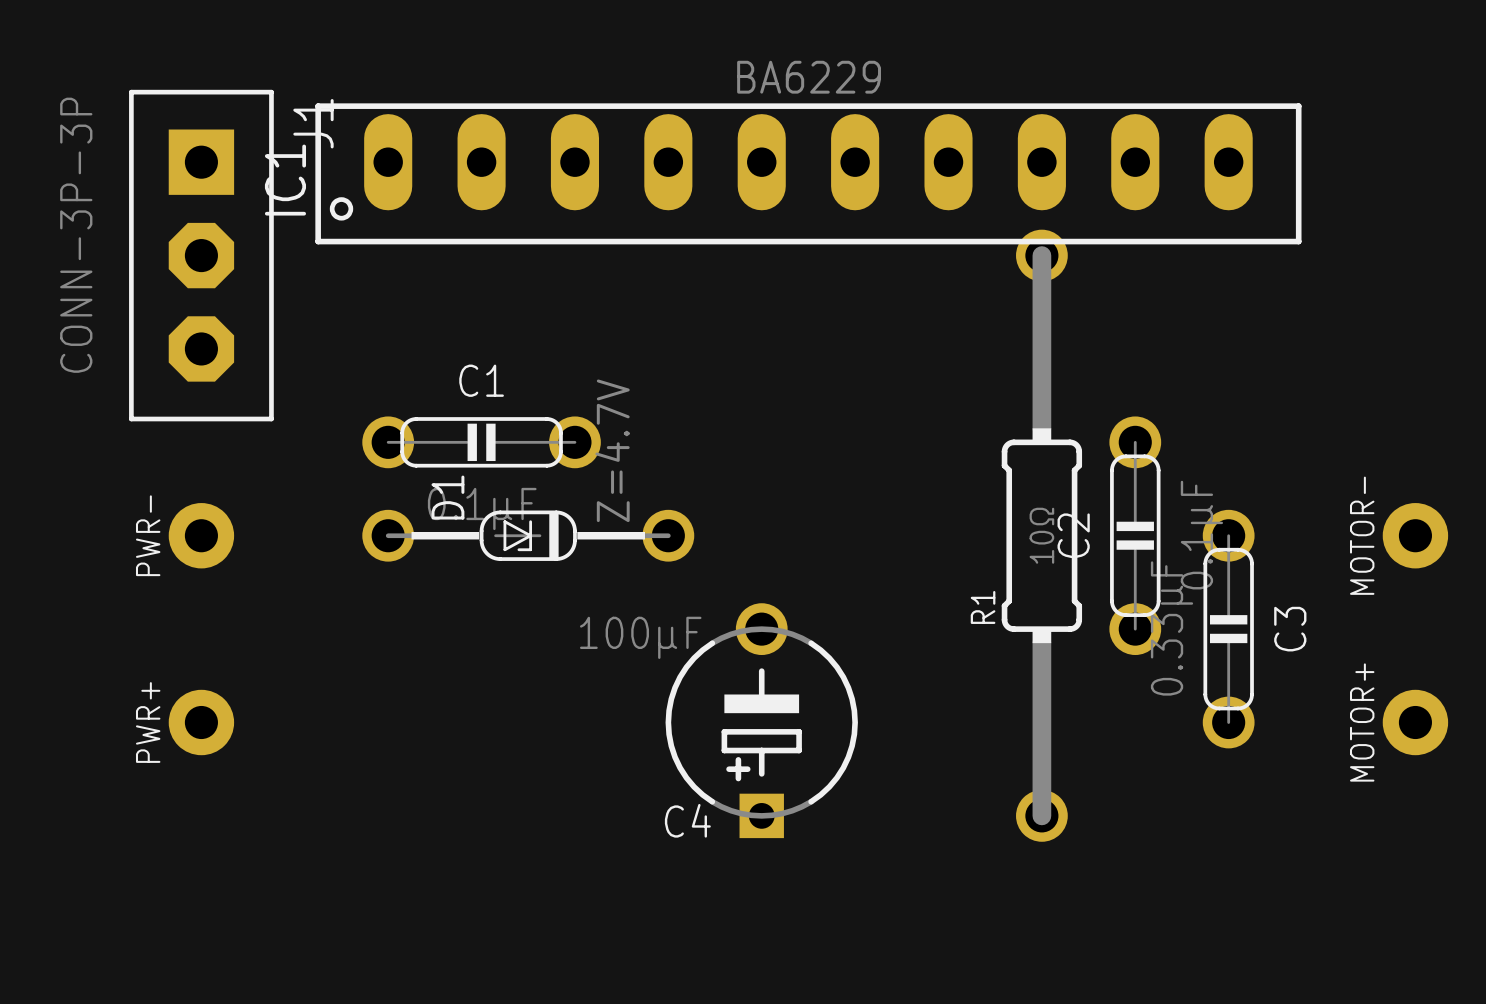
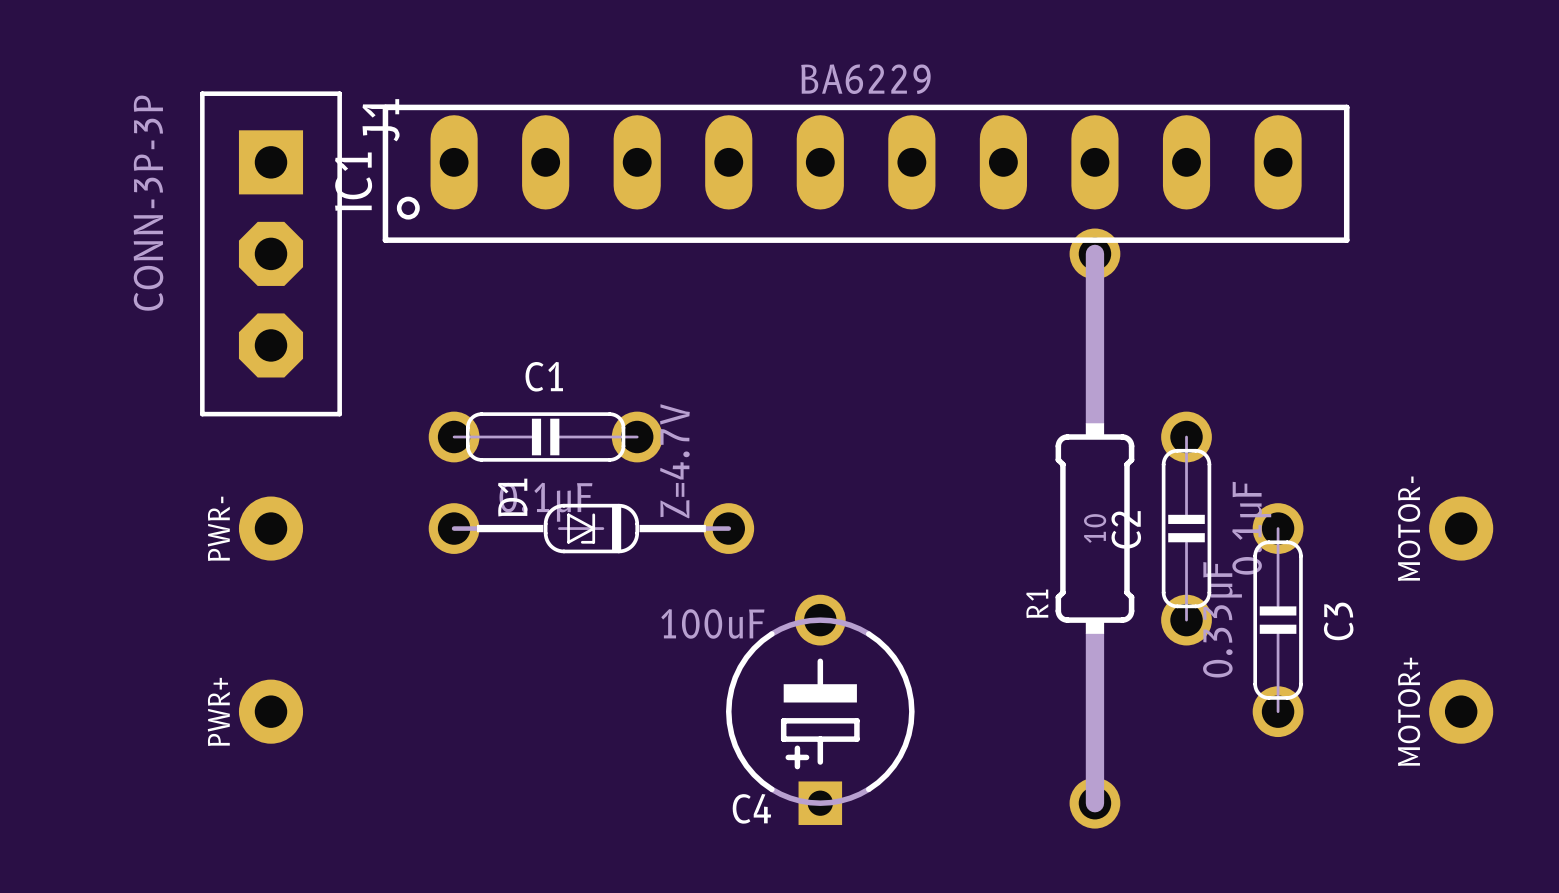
R1 value: 10Ω (1041, 535) -> 10 (1095, 528)
C4 value: 100μF (640, 637) -> 100uF (712, 623)

